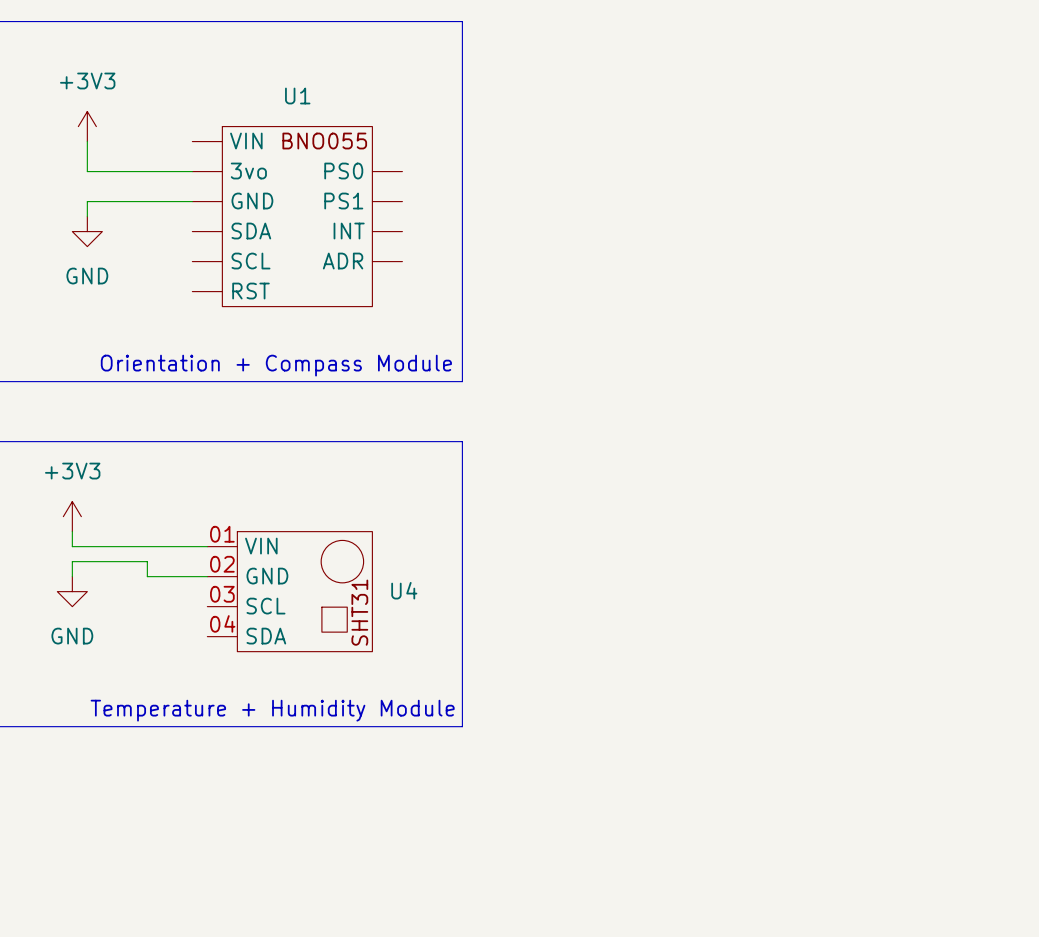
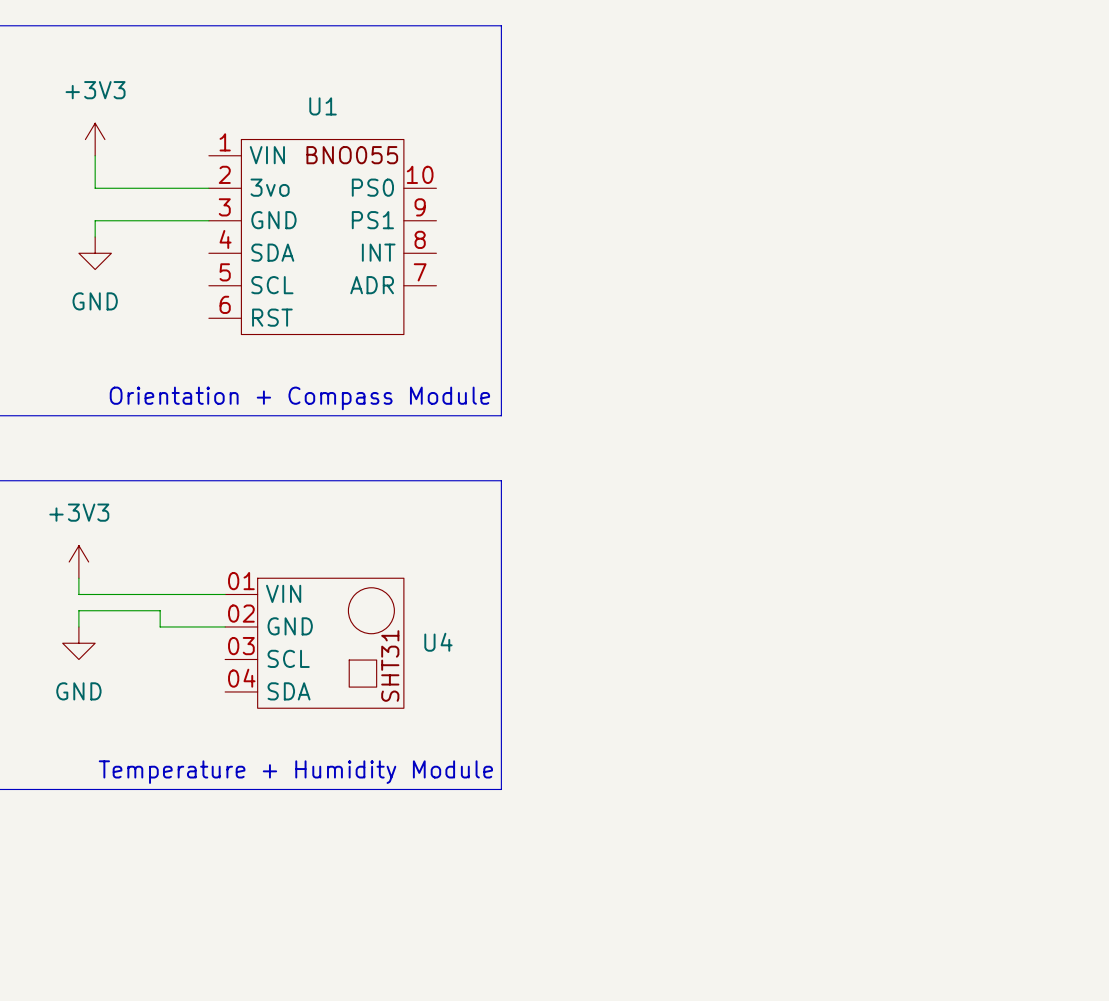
U1 symbol: [192, 126, 403, 307] -> [208, 139, 437, 335]

